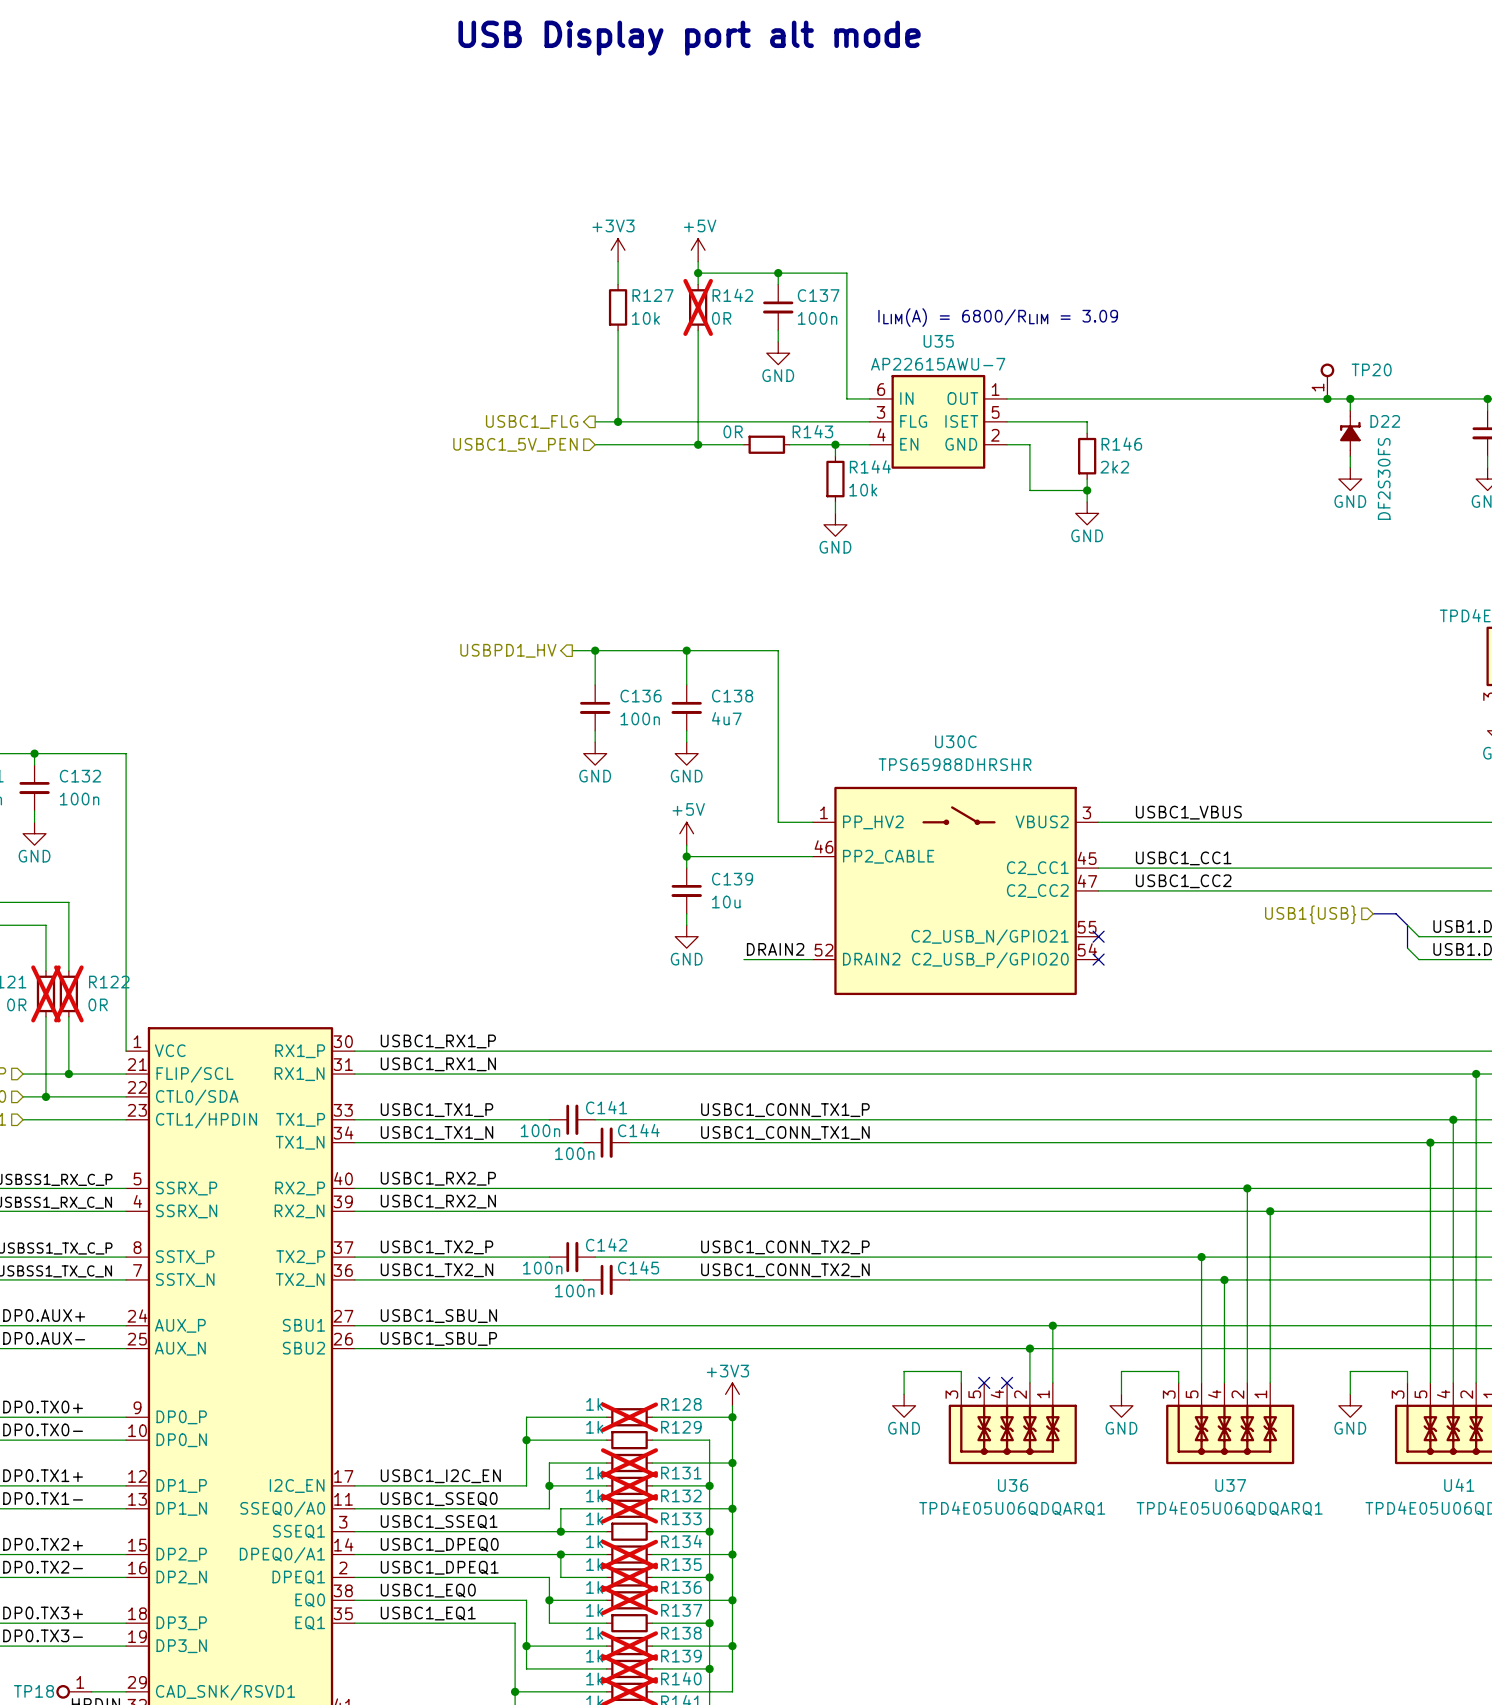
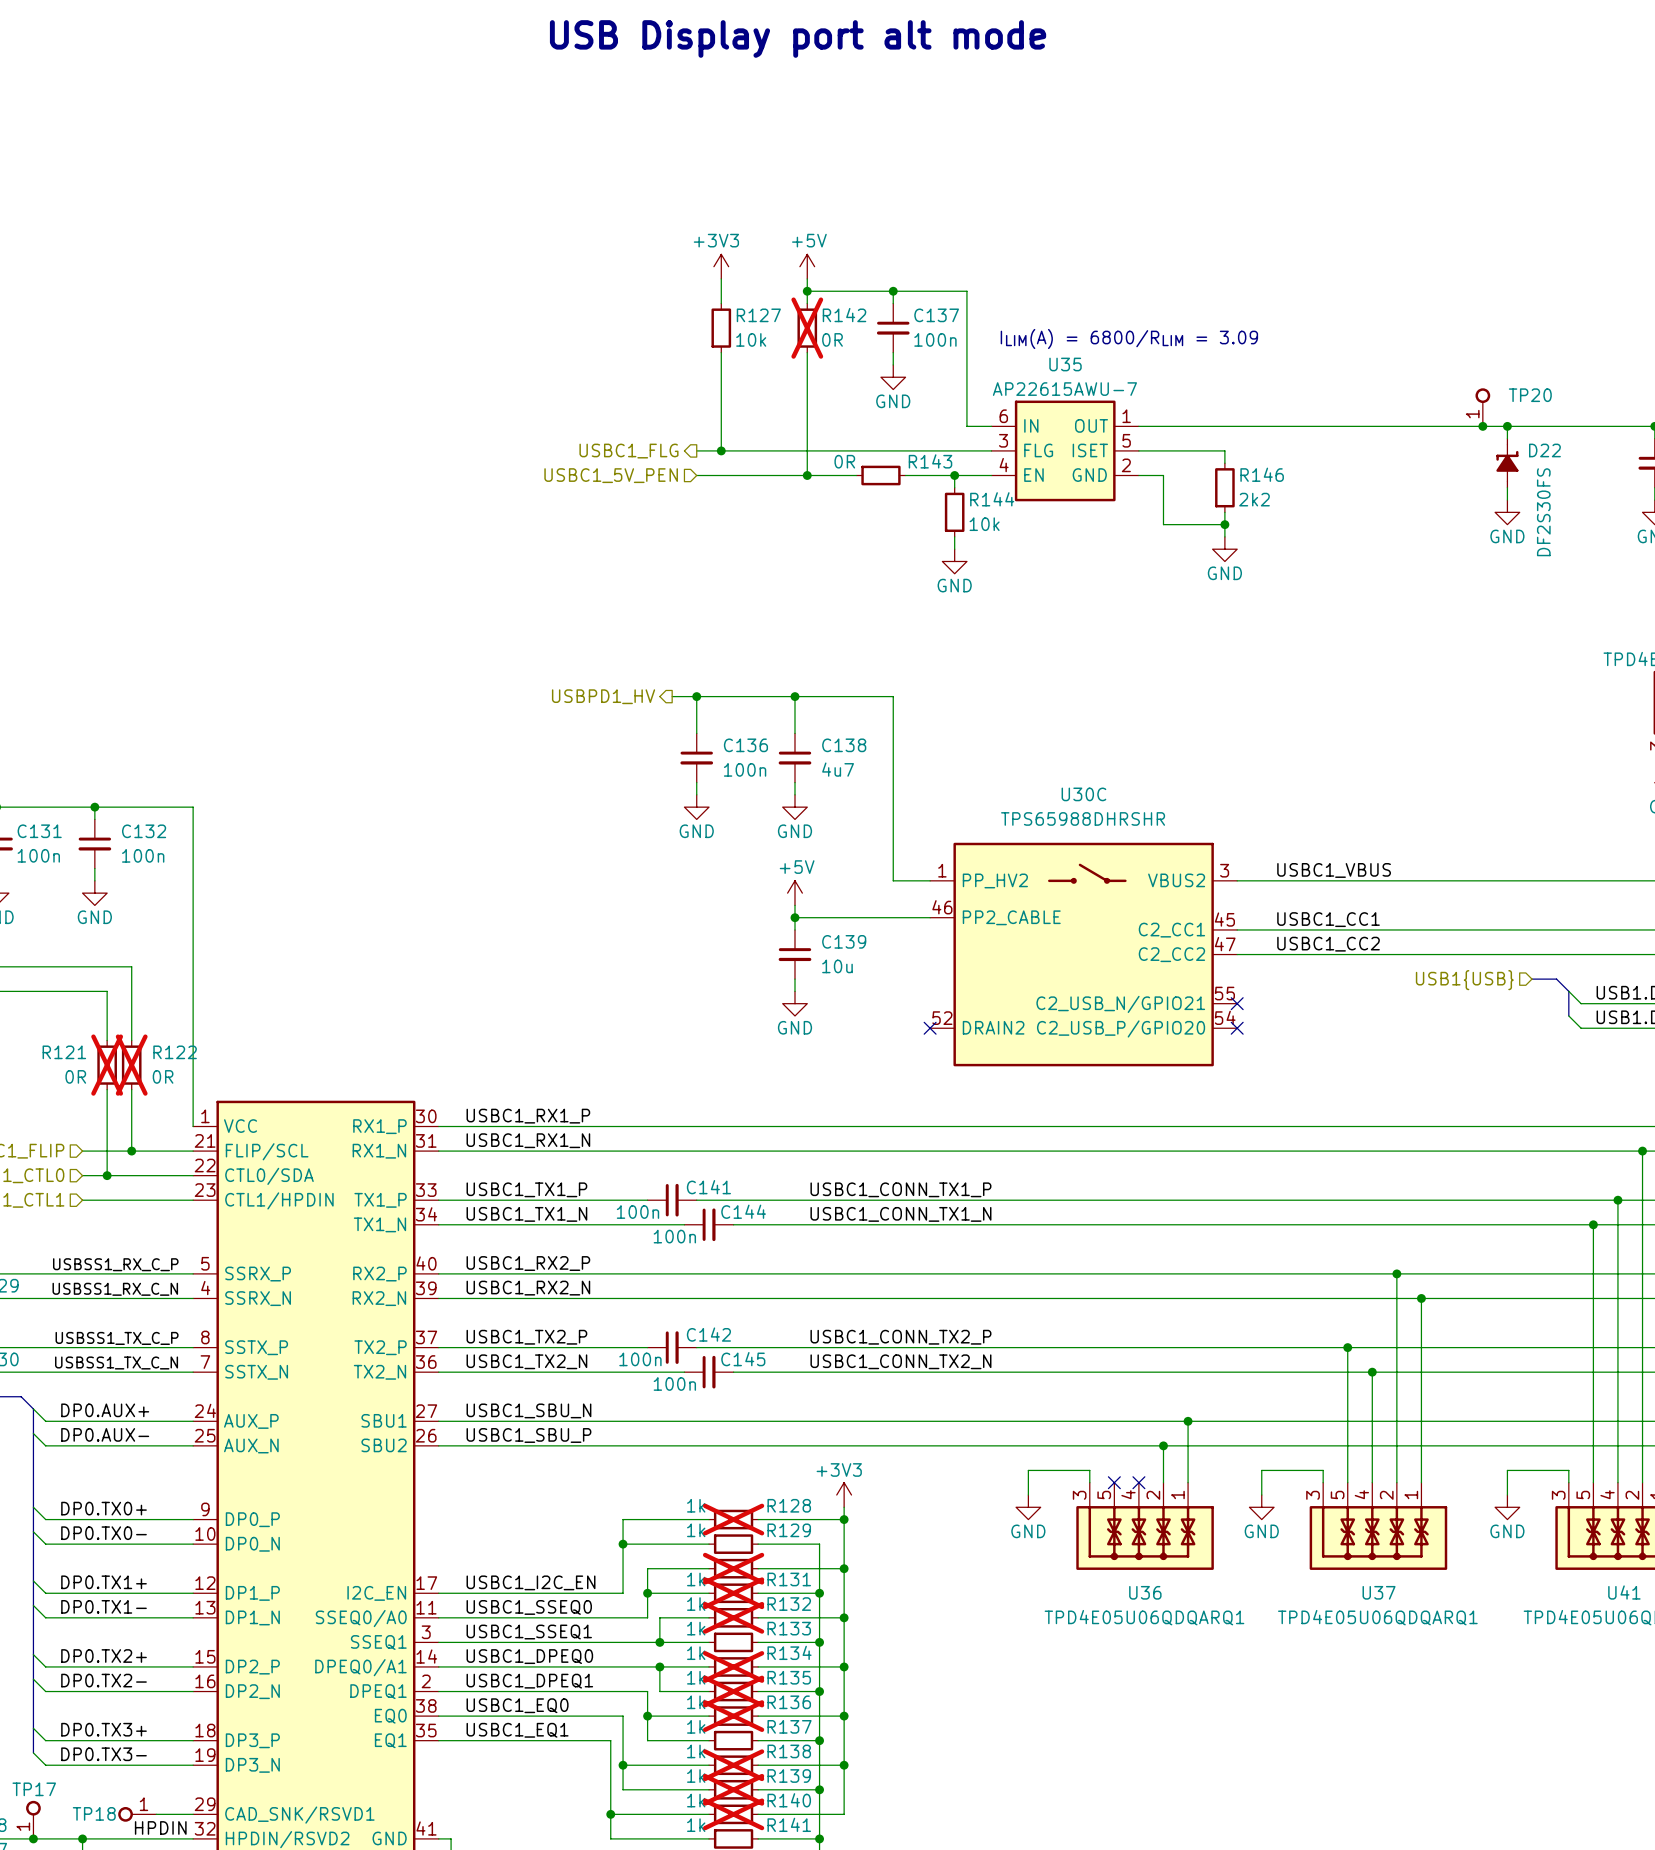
label: DRAIN2 (775, 949) -> none
wire: (743, 959) (812, 959) -> none
no-connect mark: none -> (930, 1028)

